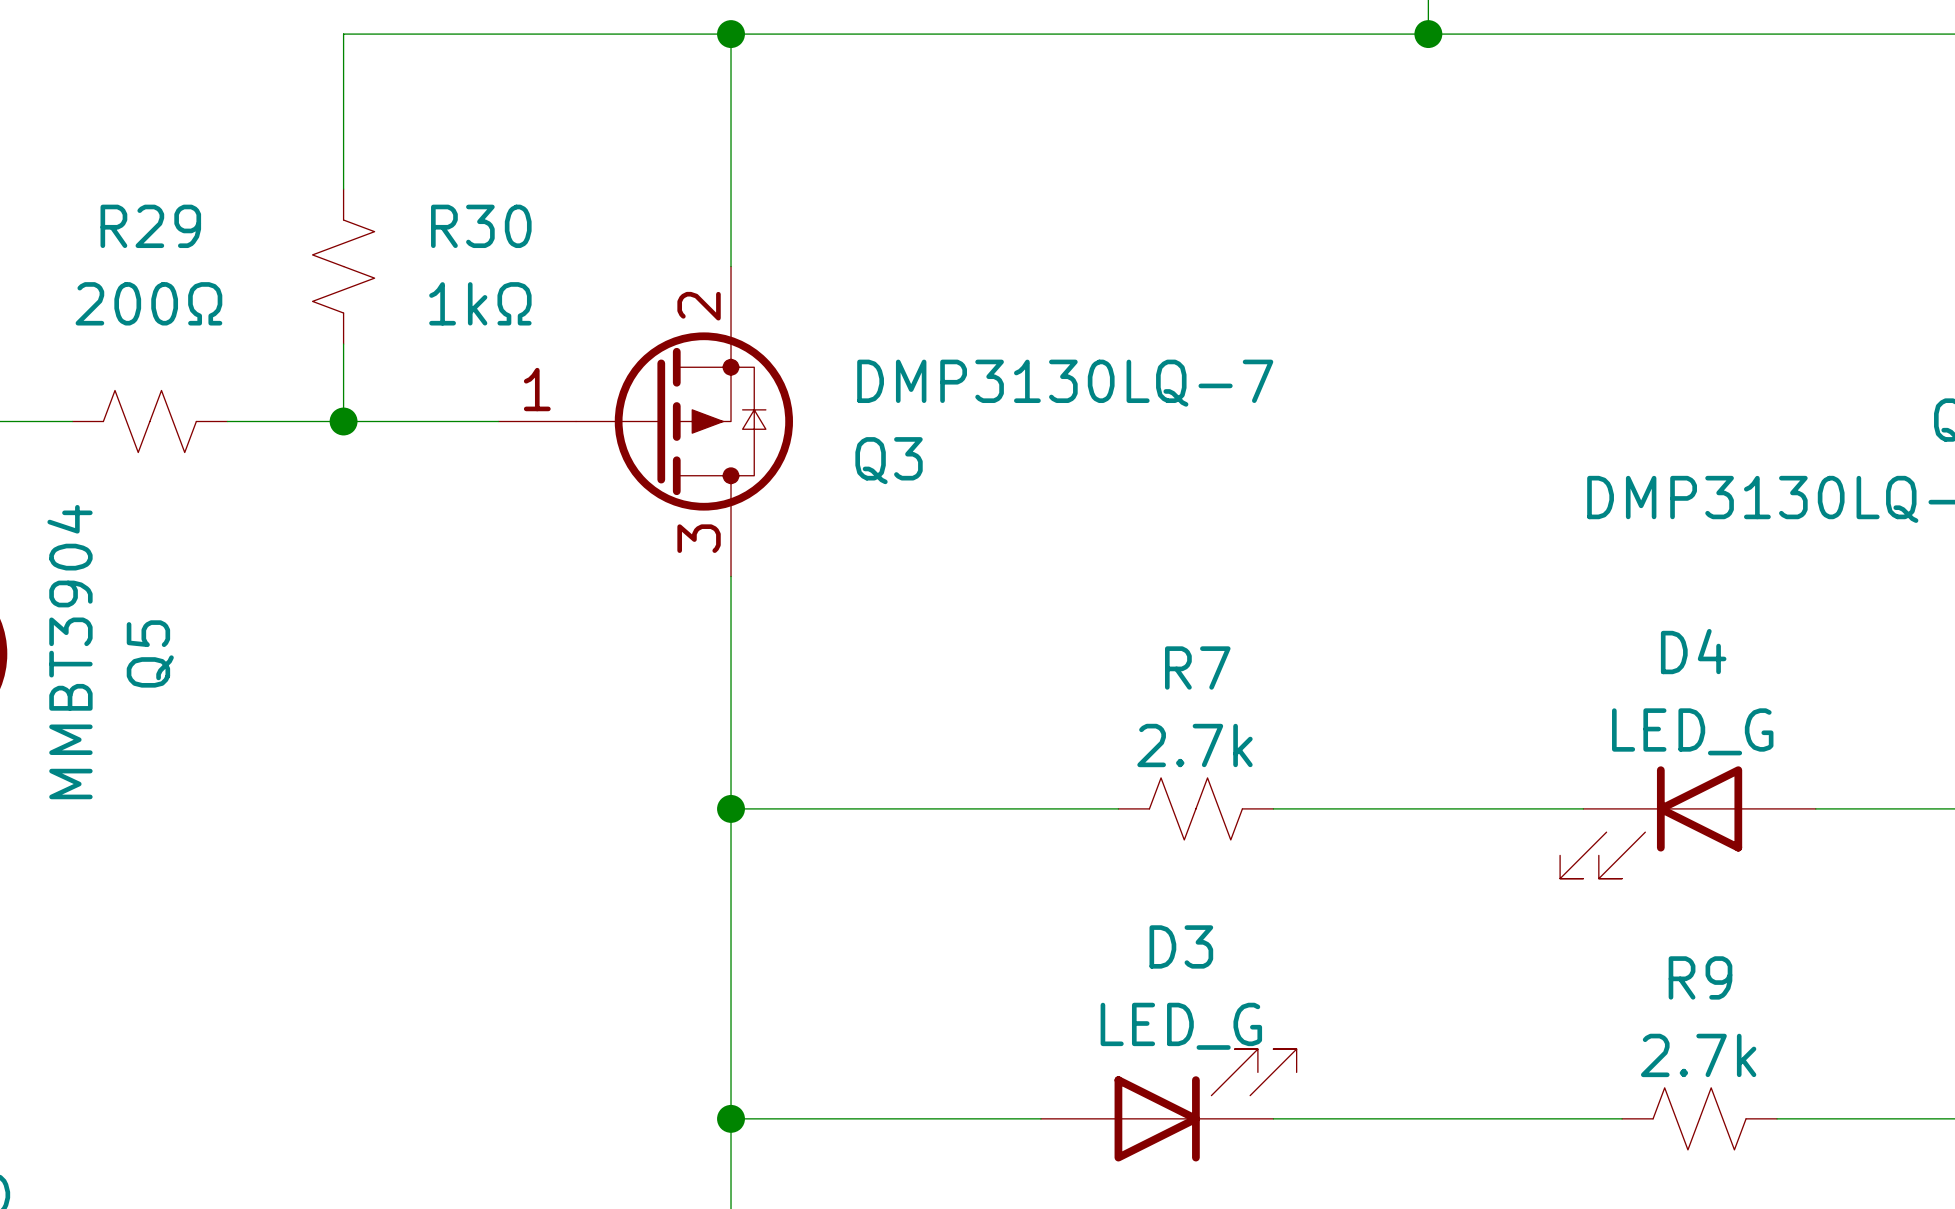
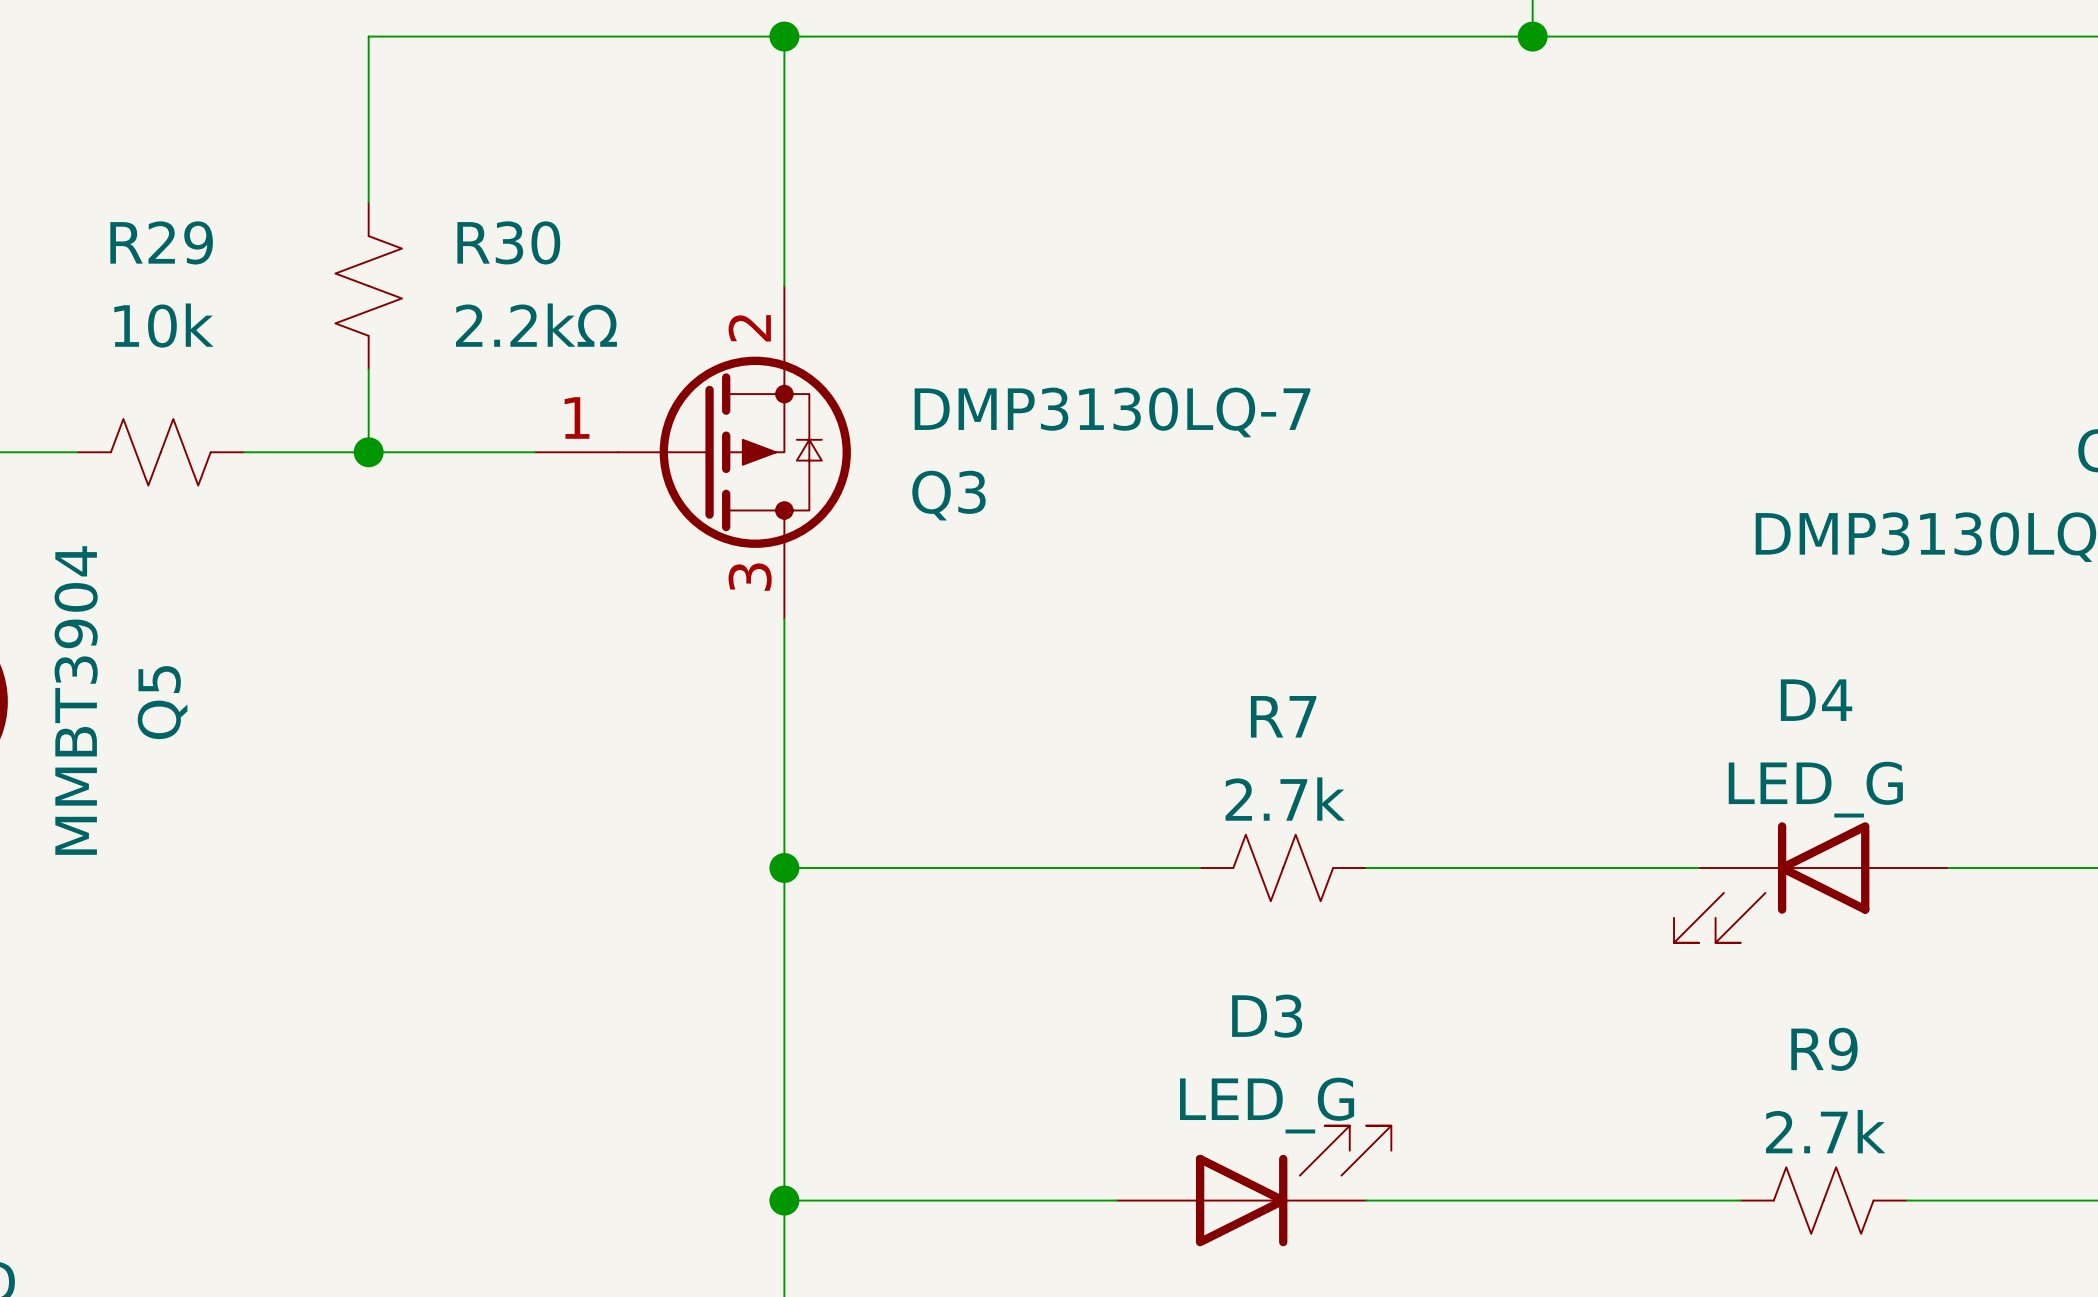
R29 value: 200Ω (148, 303) -> 10k (163, 325)
R30 value: 1kΩ (480, 303) -> 2.2kΩ (536, 325)

